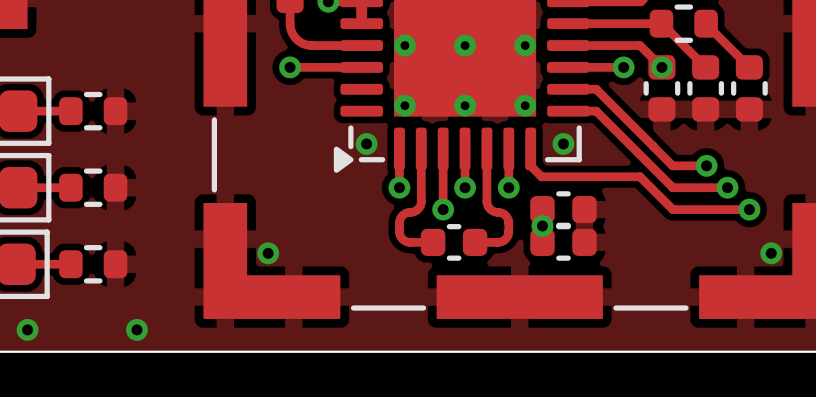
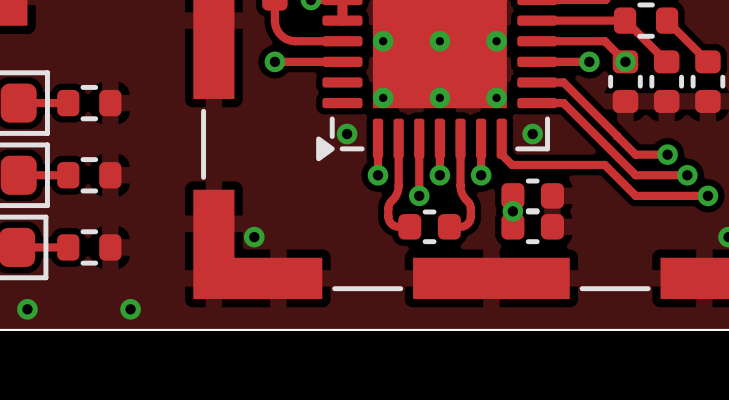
track: (421, 198) (418, 209) (404, 213) (400, 217) (399, 233) (402, 239) (407, 242) (433, 242) -> (398, 185) (397, 193) (392, 200)
track: (486, 198) (490, 209) (503, 213) (507, 217) (508, 234) (500, 242) (475, 242) -> (460, 185) (462, 193) (466, 200)
track: none -> (391, 201) (388, 207) (388, 218) (392, 224) (398, 226)
track: none -> (467, 201) (470, 207) (470, 218) (466, 224) (460, 226)

